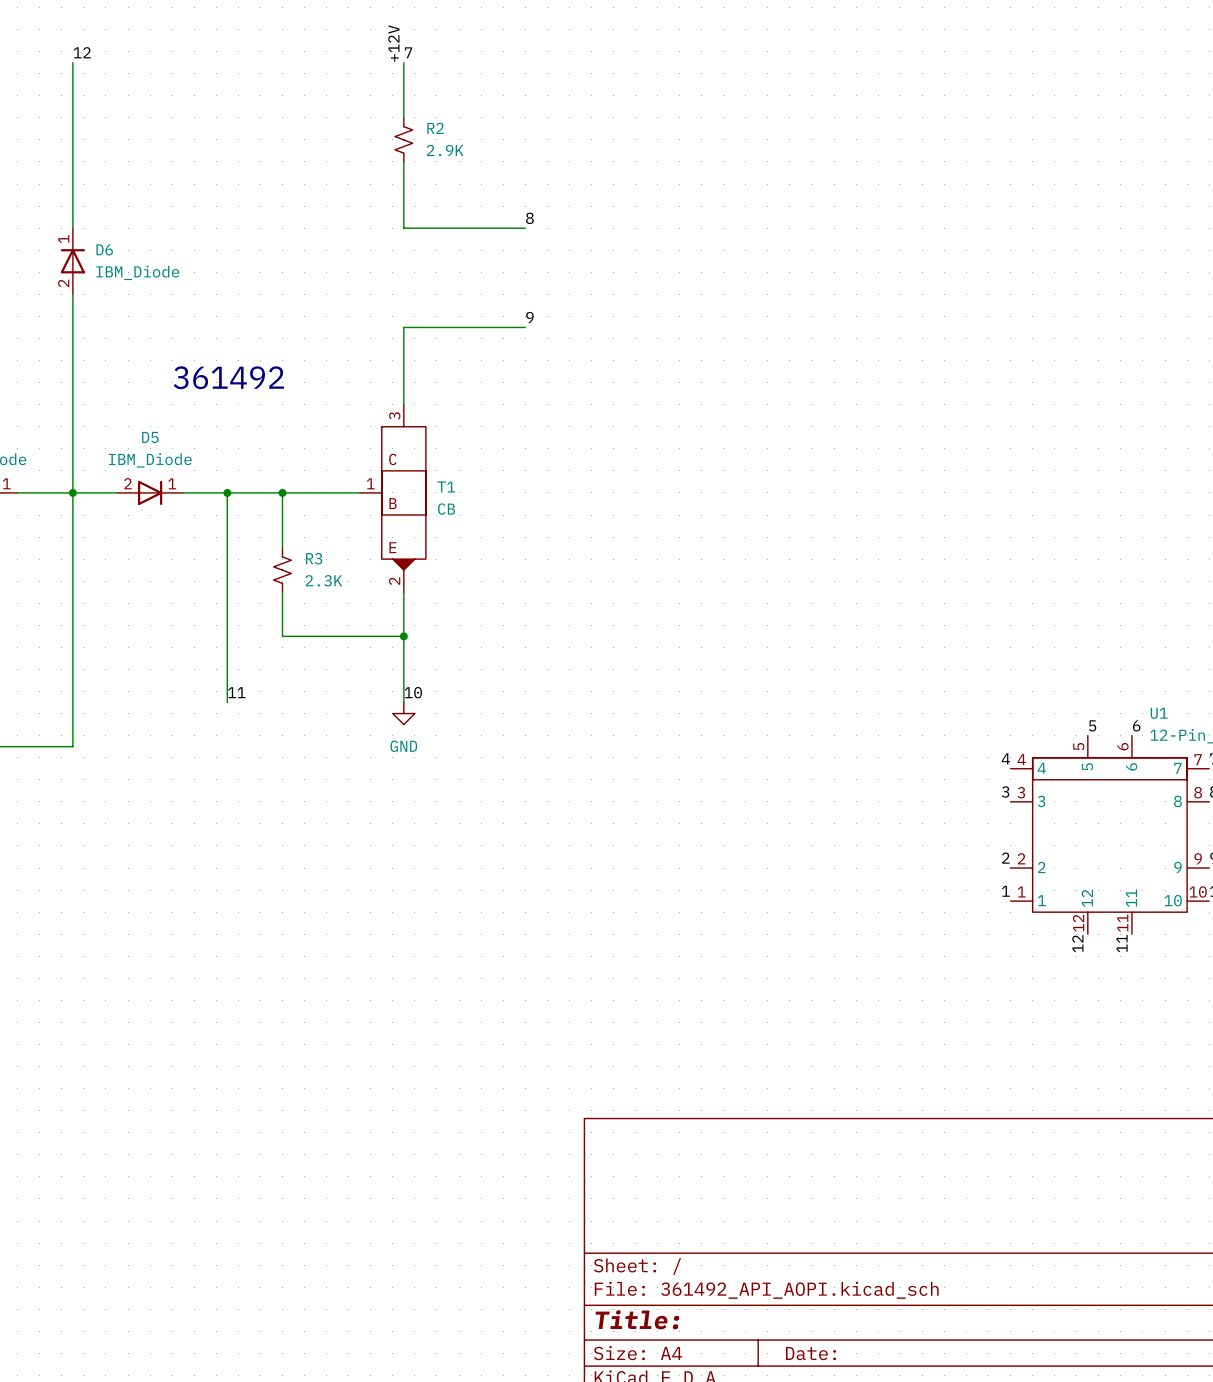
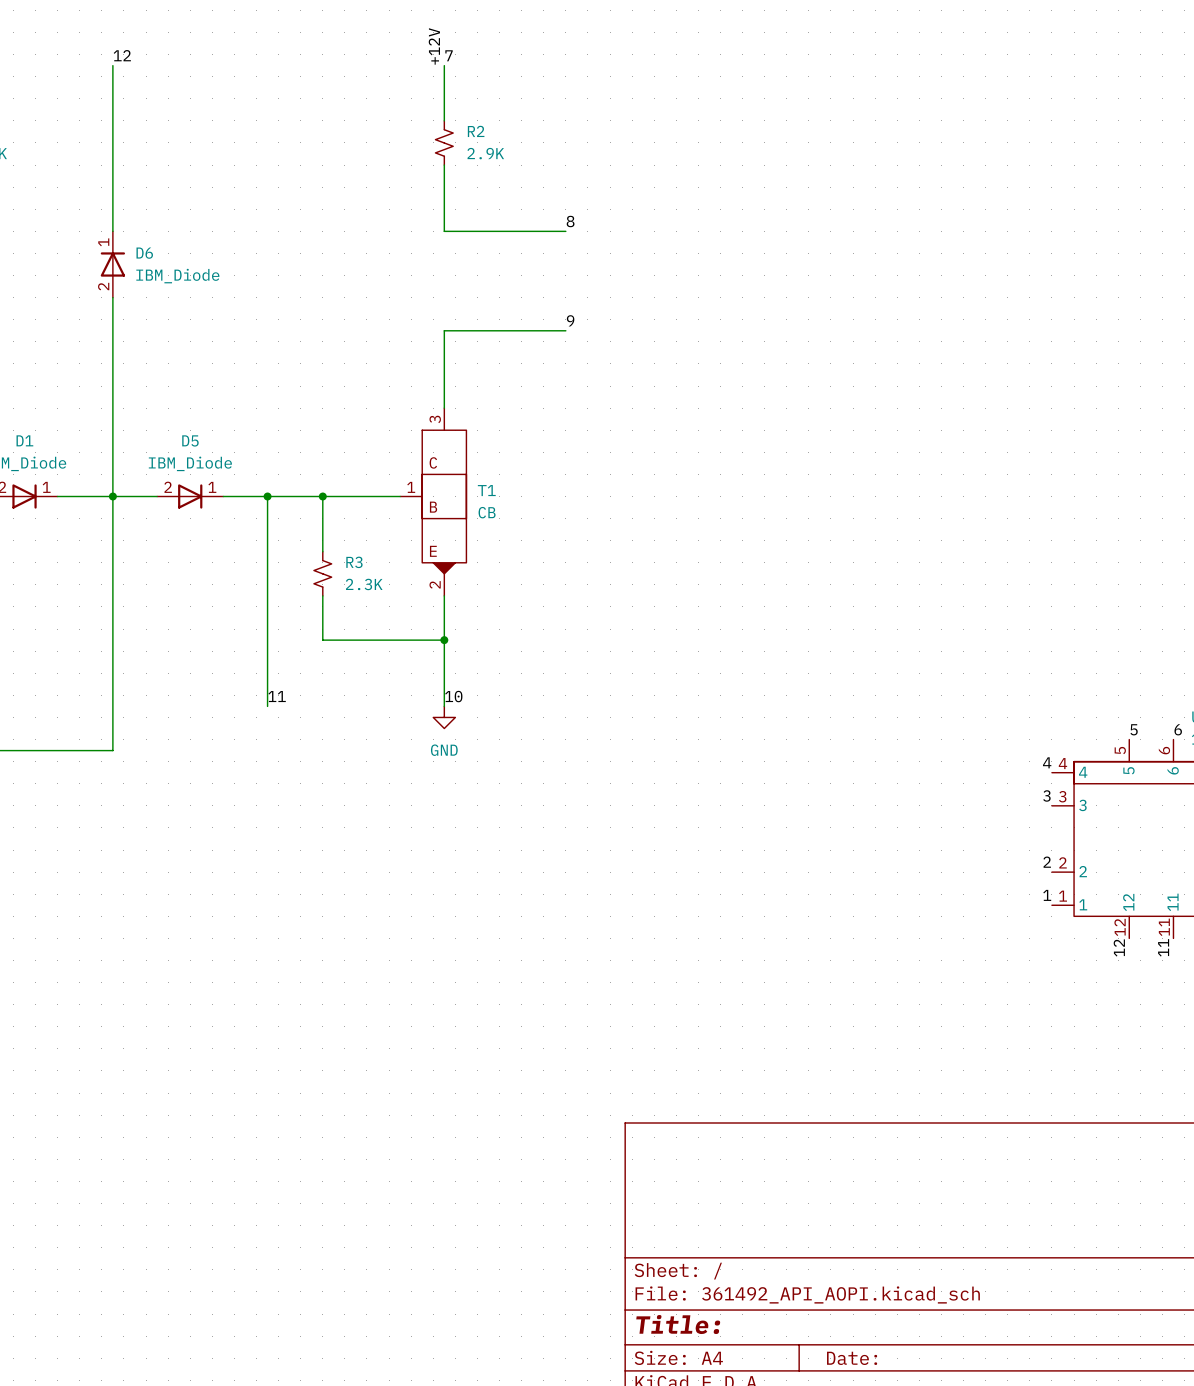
text: 361492 (228, 377) -> none

